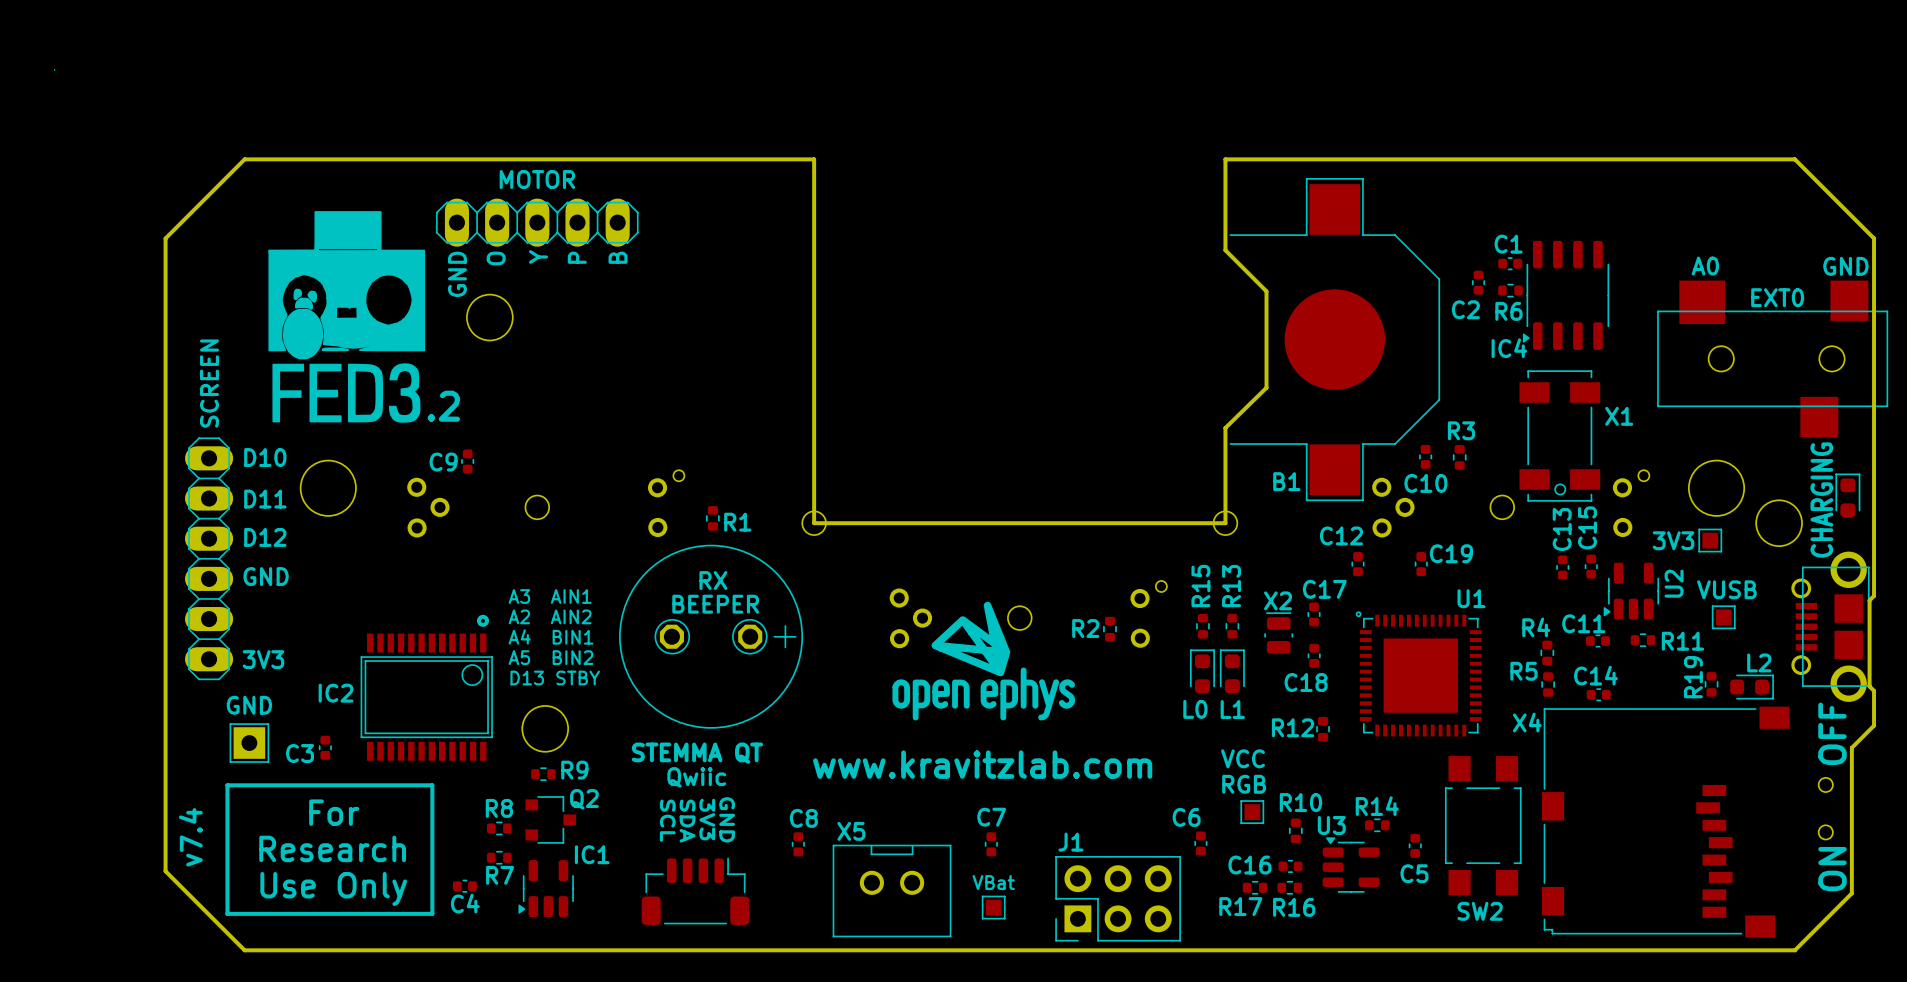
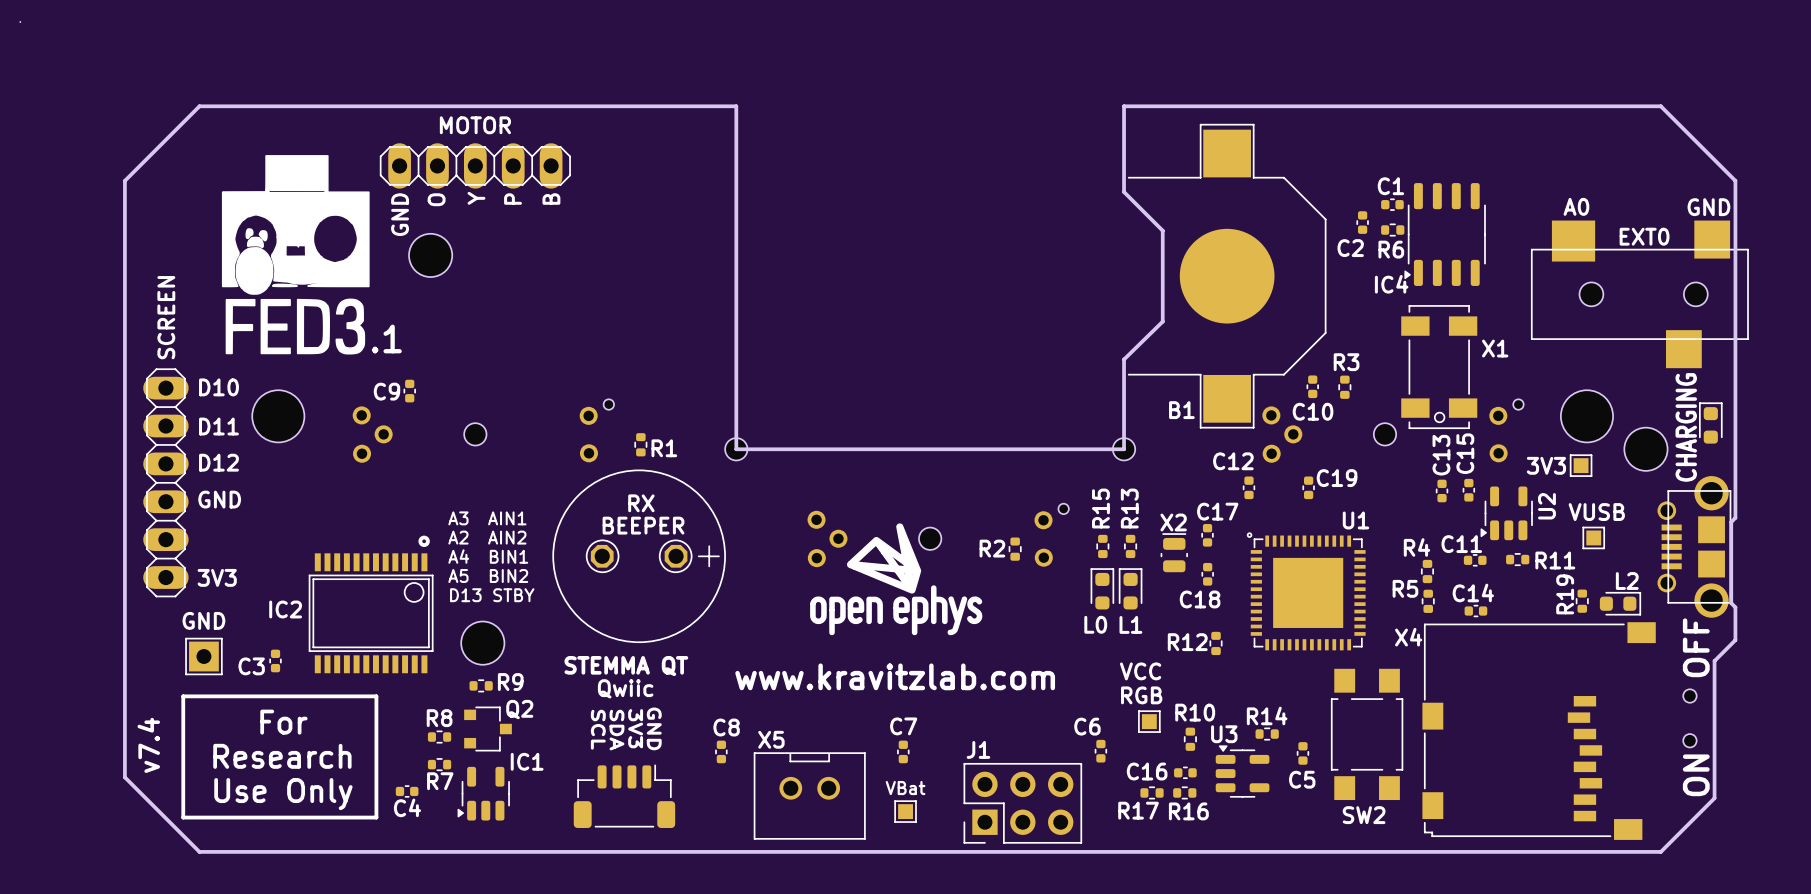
text: .2 (443, 406) -> .1 (386, 338)

